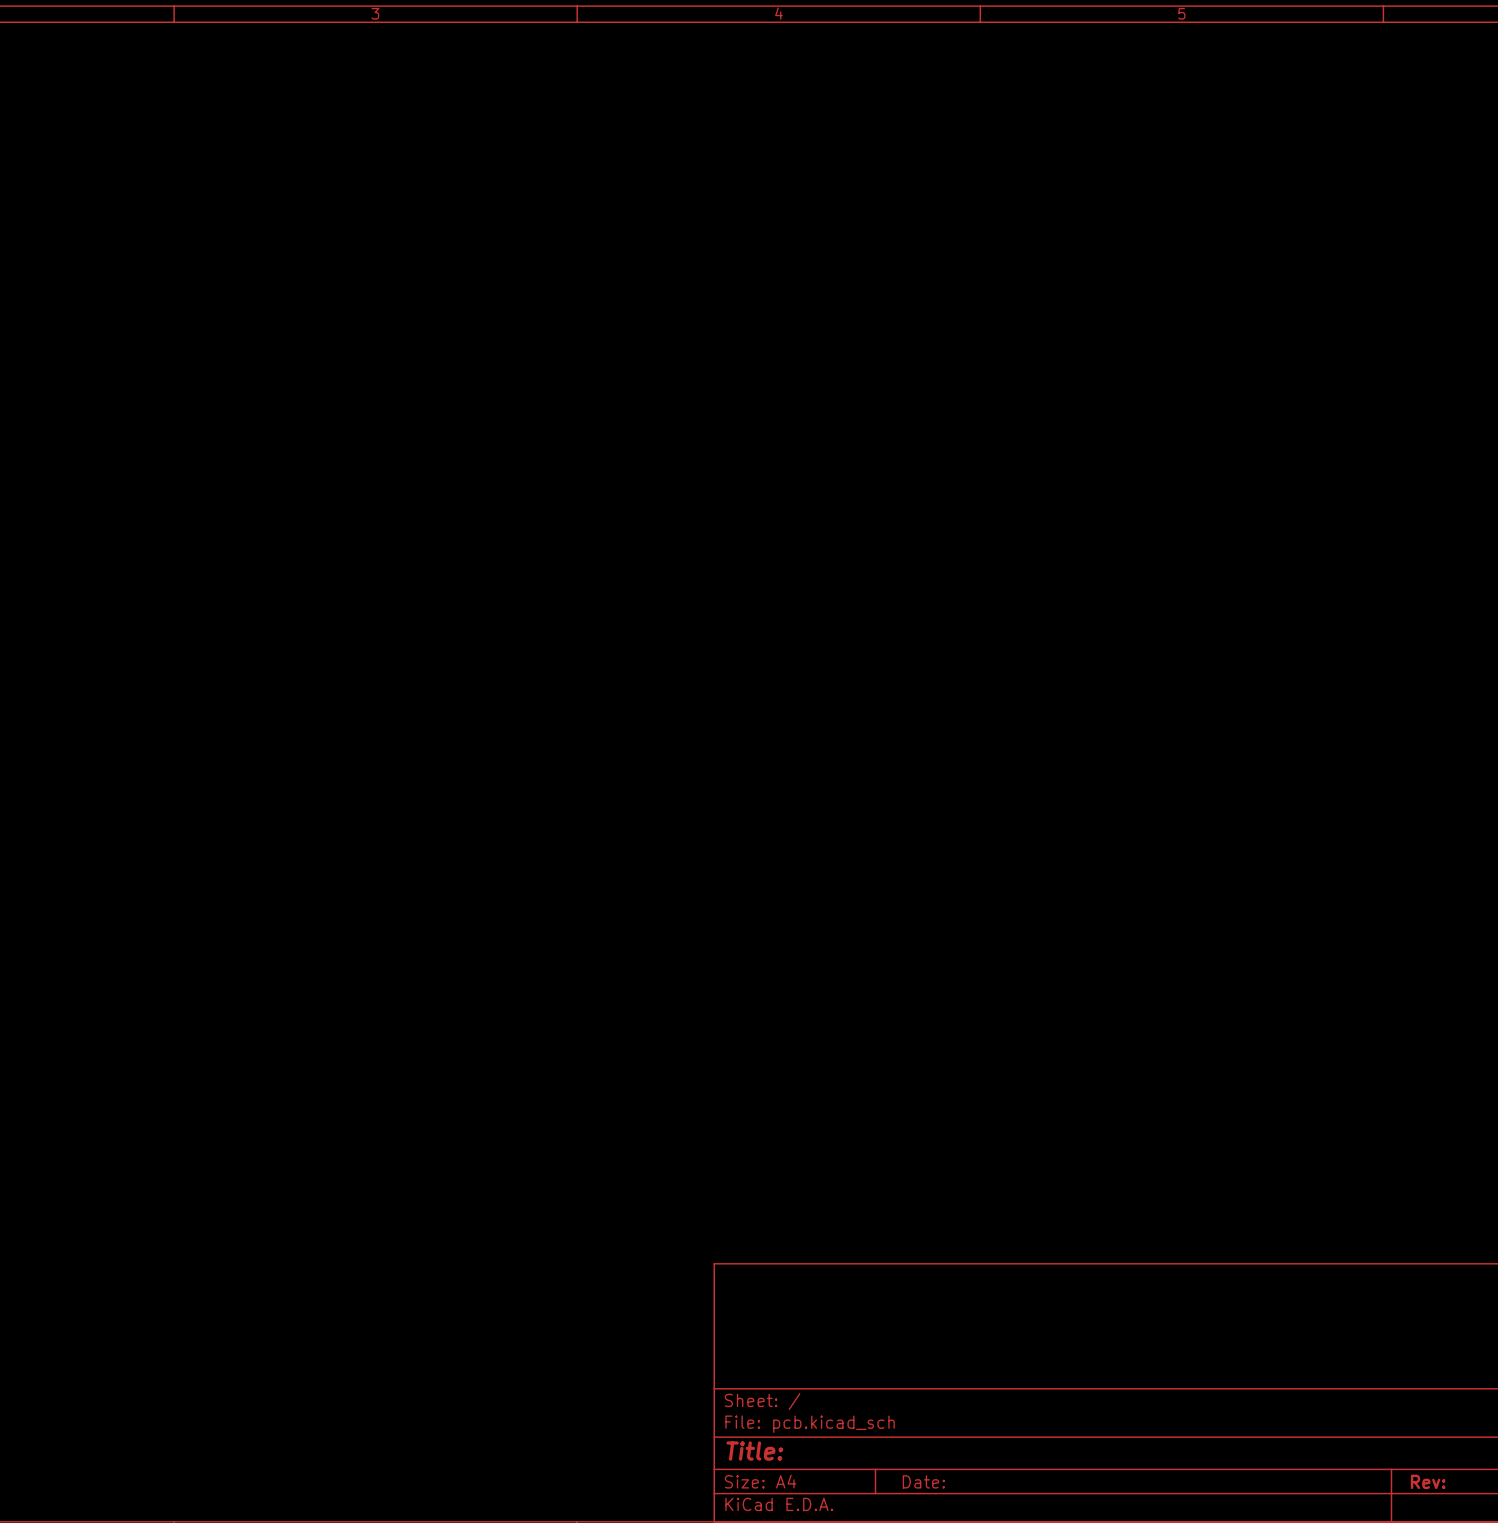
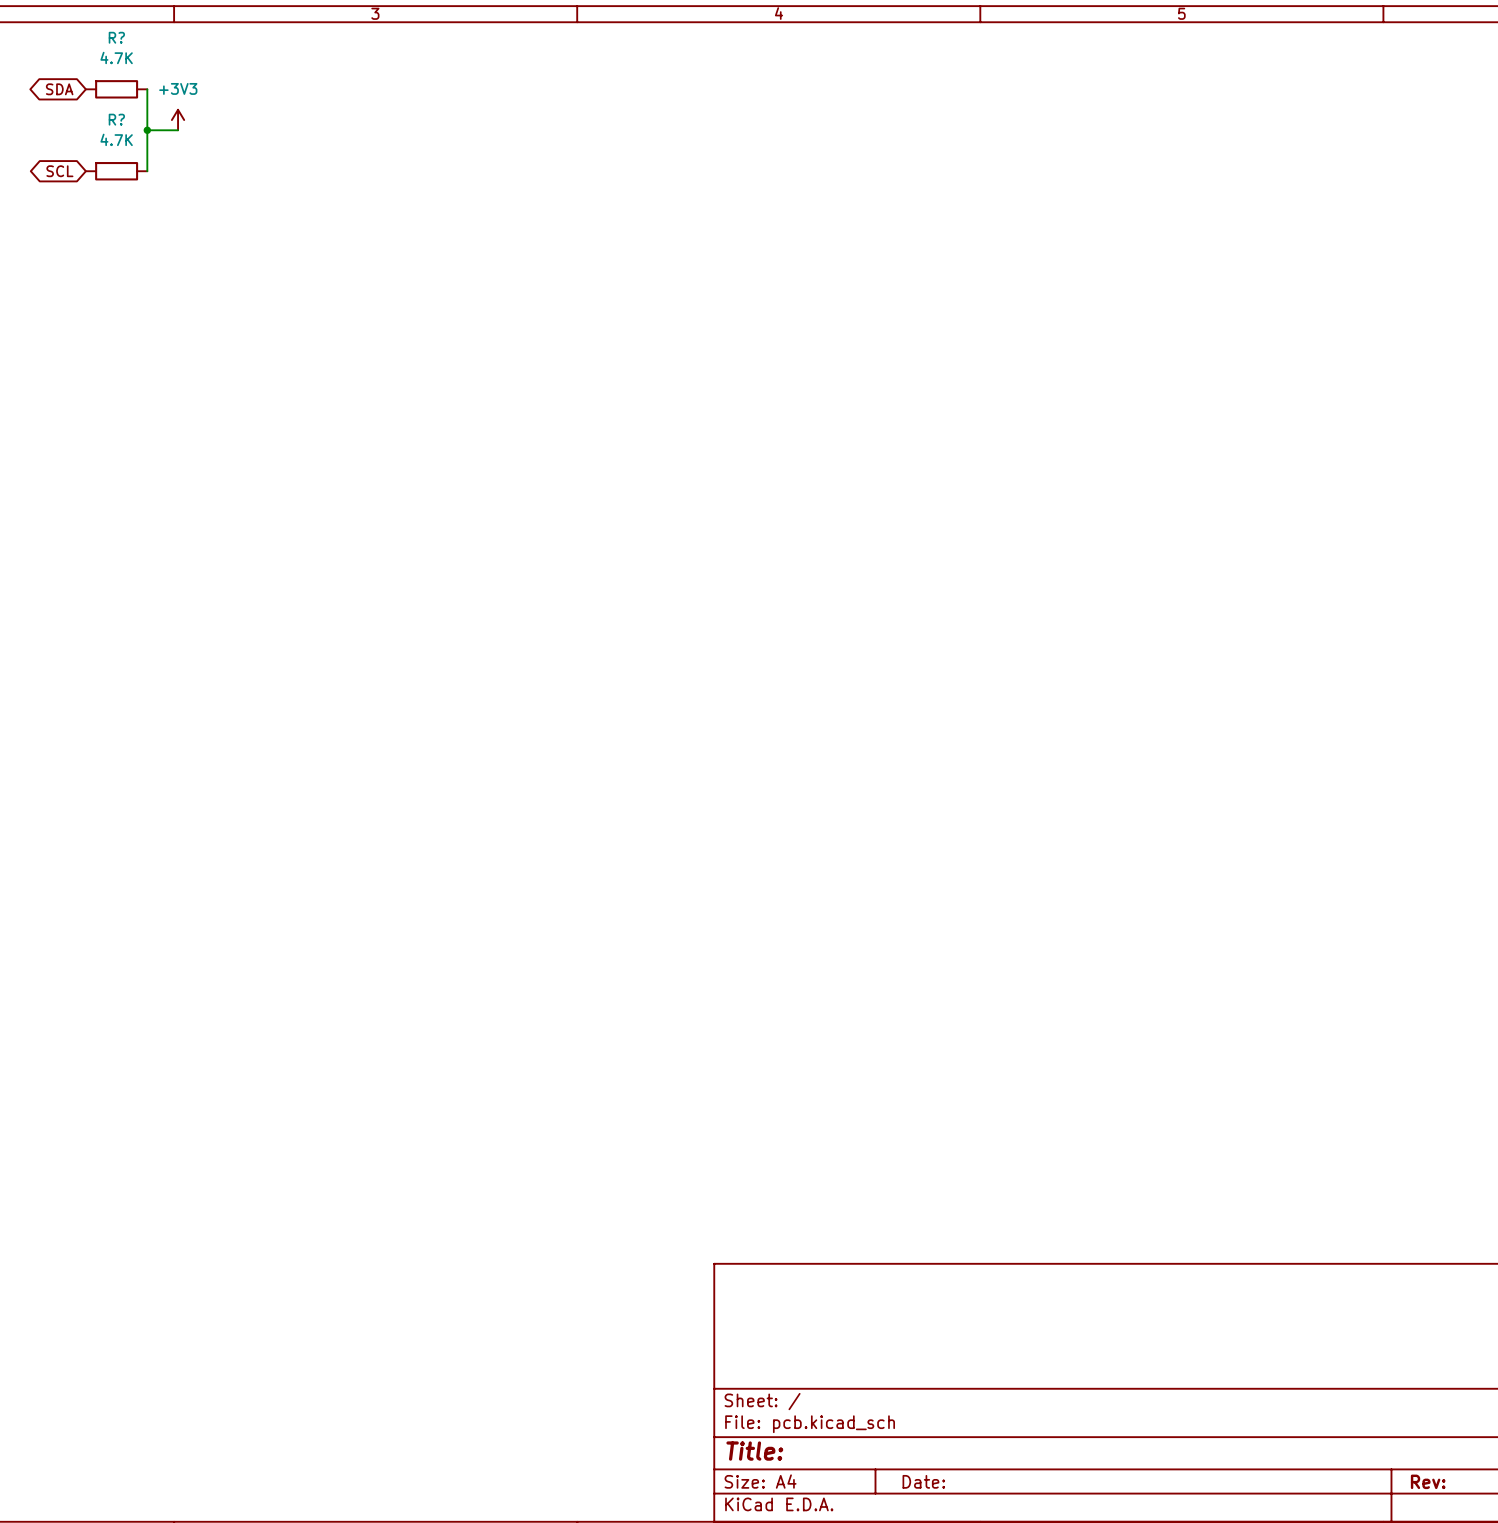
global label: none -> SDA (59, 89)
R?: none -> 4.7K (116, 89)
wire: none -> (147, 89) (147, 171)
power symbol: none -> +3V3 (178, 120)
wire: none -> (147, 130) (178, 130)
junction: none -> (147, 130)
global label: none -> SCL (59, 171)
R?: none -> 4.7K (116, 171)

